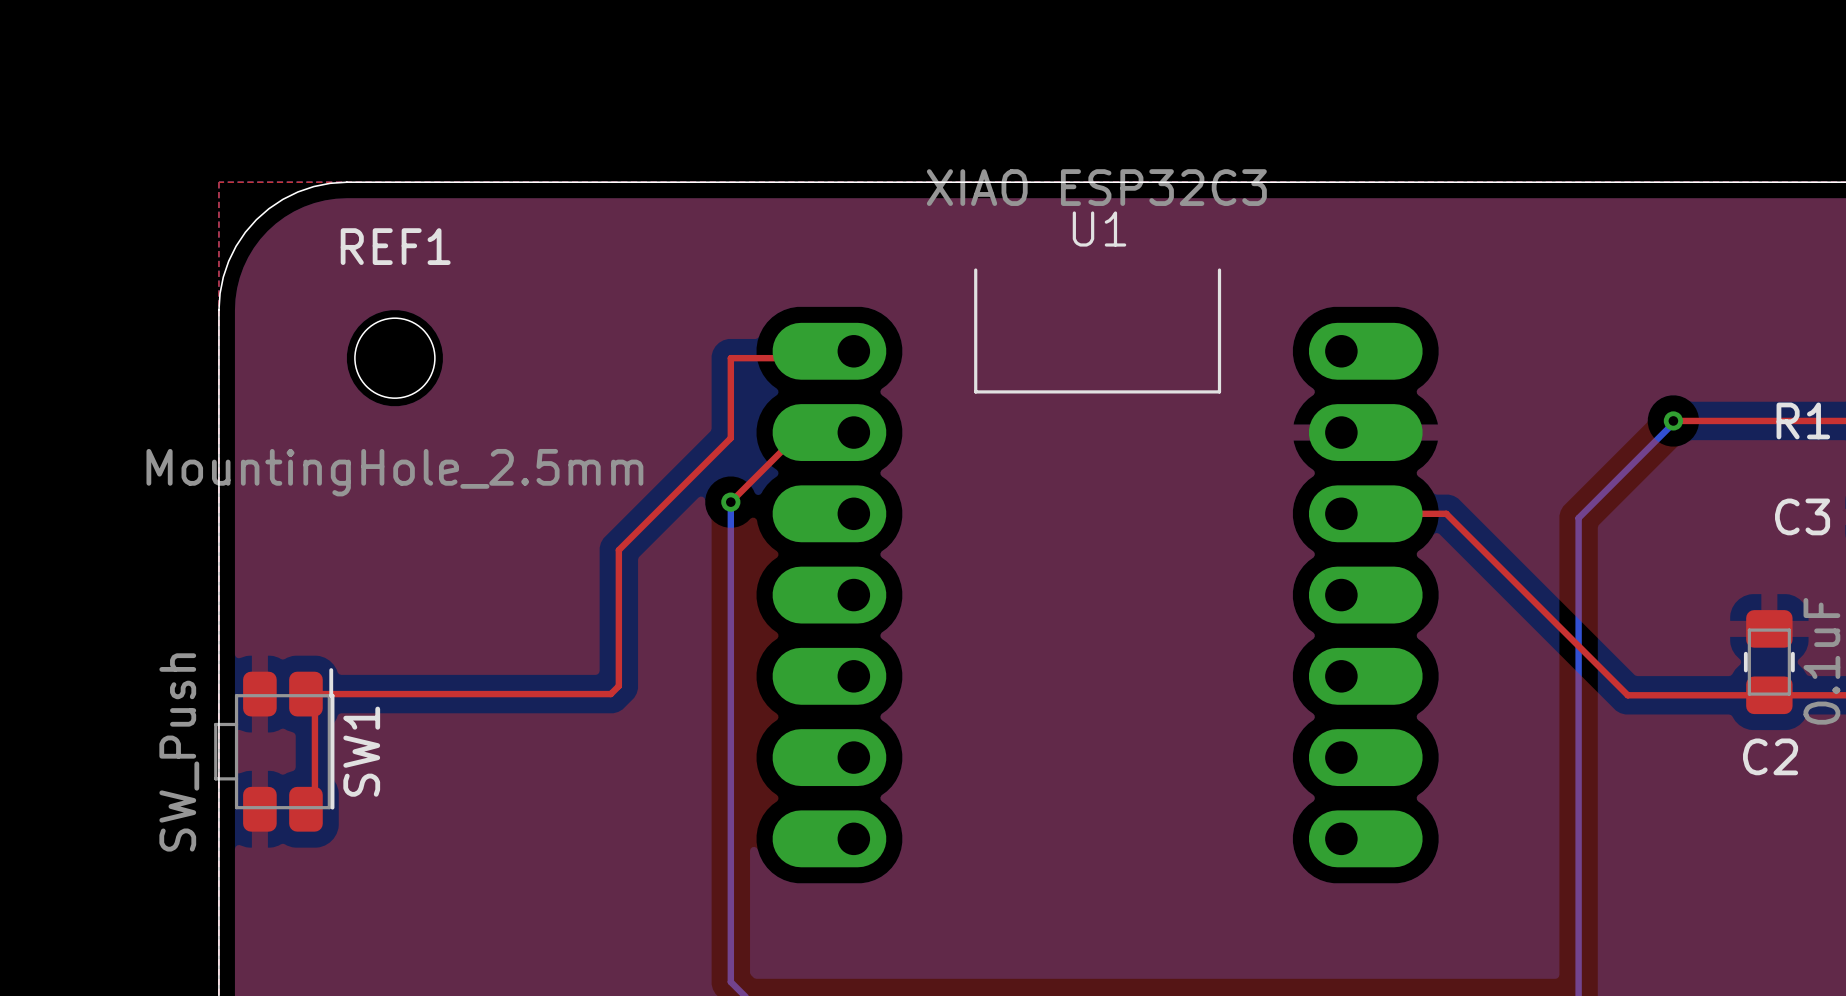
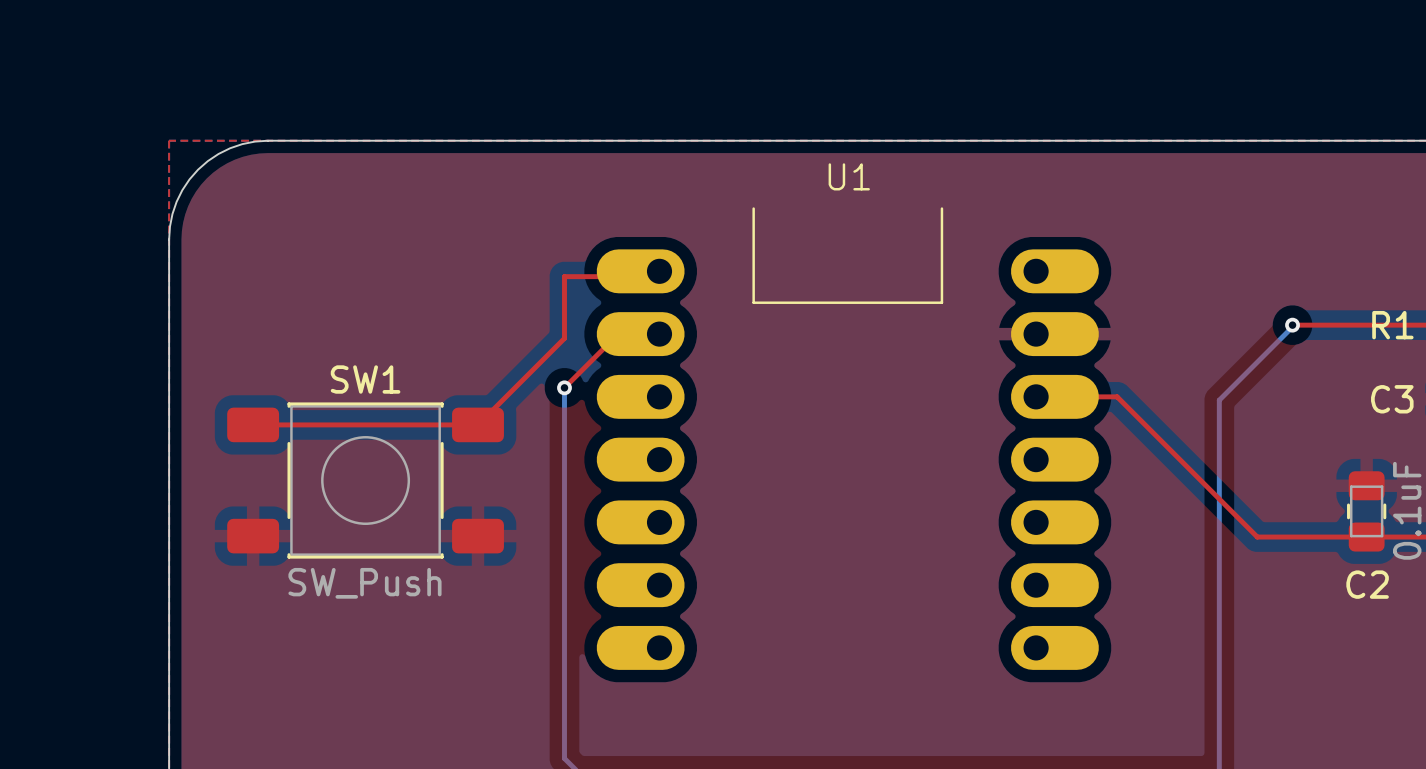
U1 value: XIAO ESP32C3 (1096, 187) -> none
REF1: MountingHole_2.5mm (394, 358) -> none
top track: (618, 550) (618, 686) (610, 694) (314, 694) (314, 809) -> (478, 424) (253, 424)
SW1 footprint: [214, 668, 335, 832] -> [227, 402, 504, 559]
SW1 name position: SW1 (361, 751) -> SW1 (365, 379)
SW1 value position: SW_Push (179, 752) -> SW_Push (364, 583)

